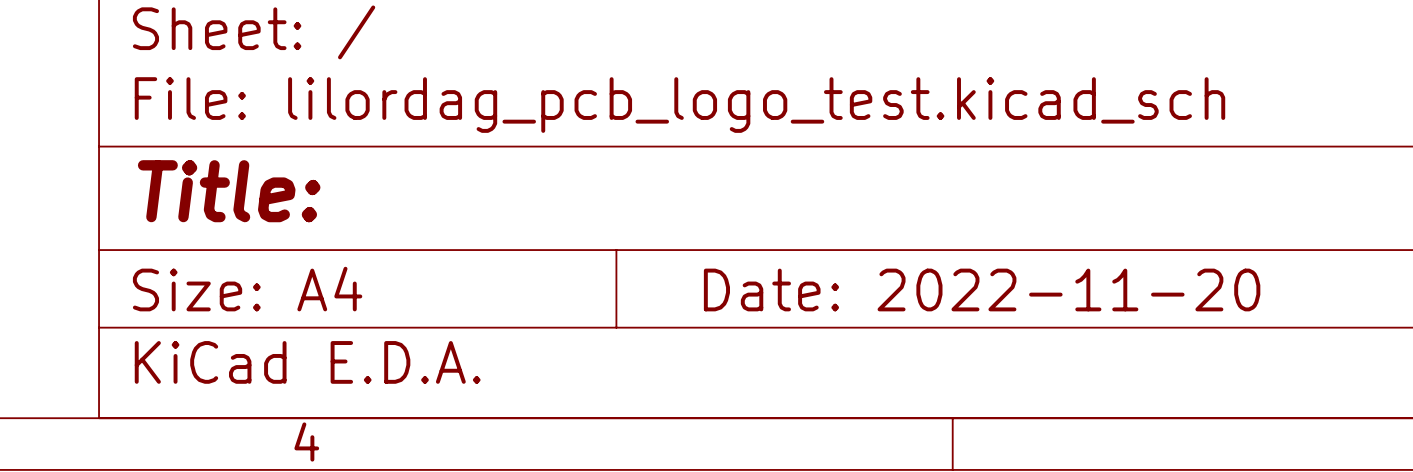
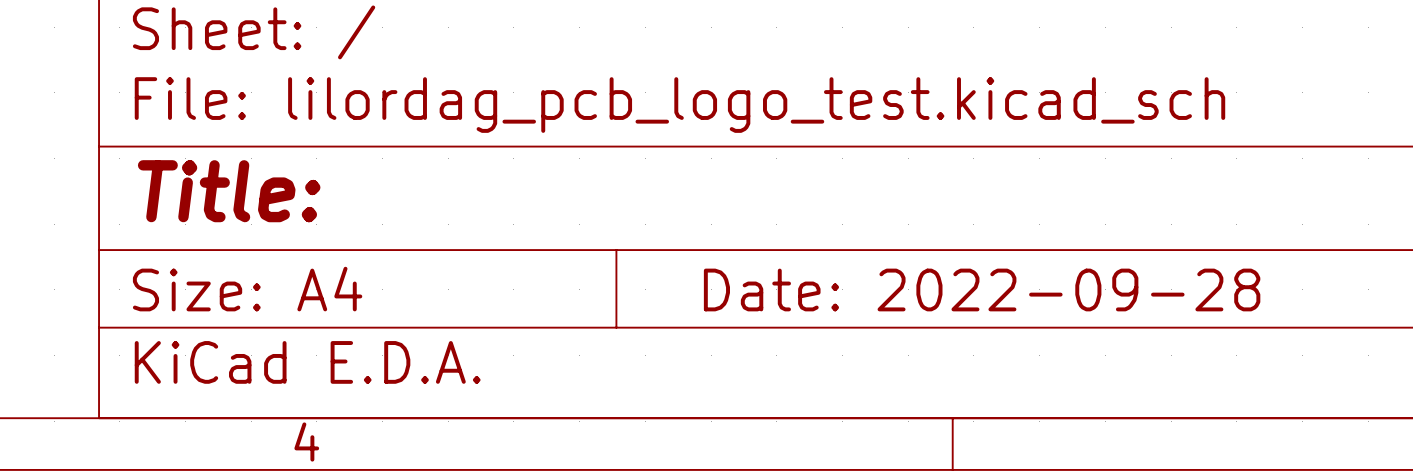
title block: Date: 2022-11-20 (982, 289) -> Date: 2022-09-28 (982, 289)

